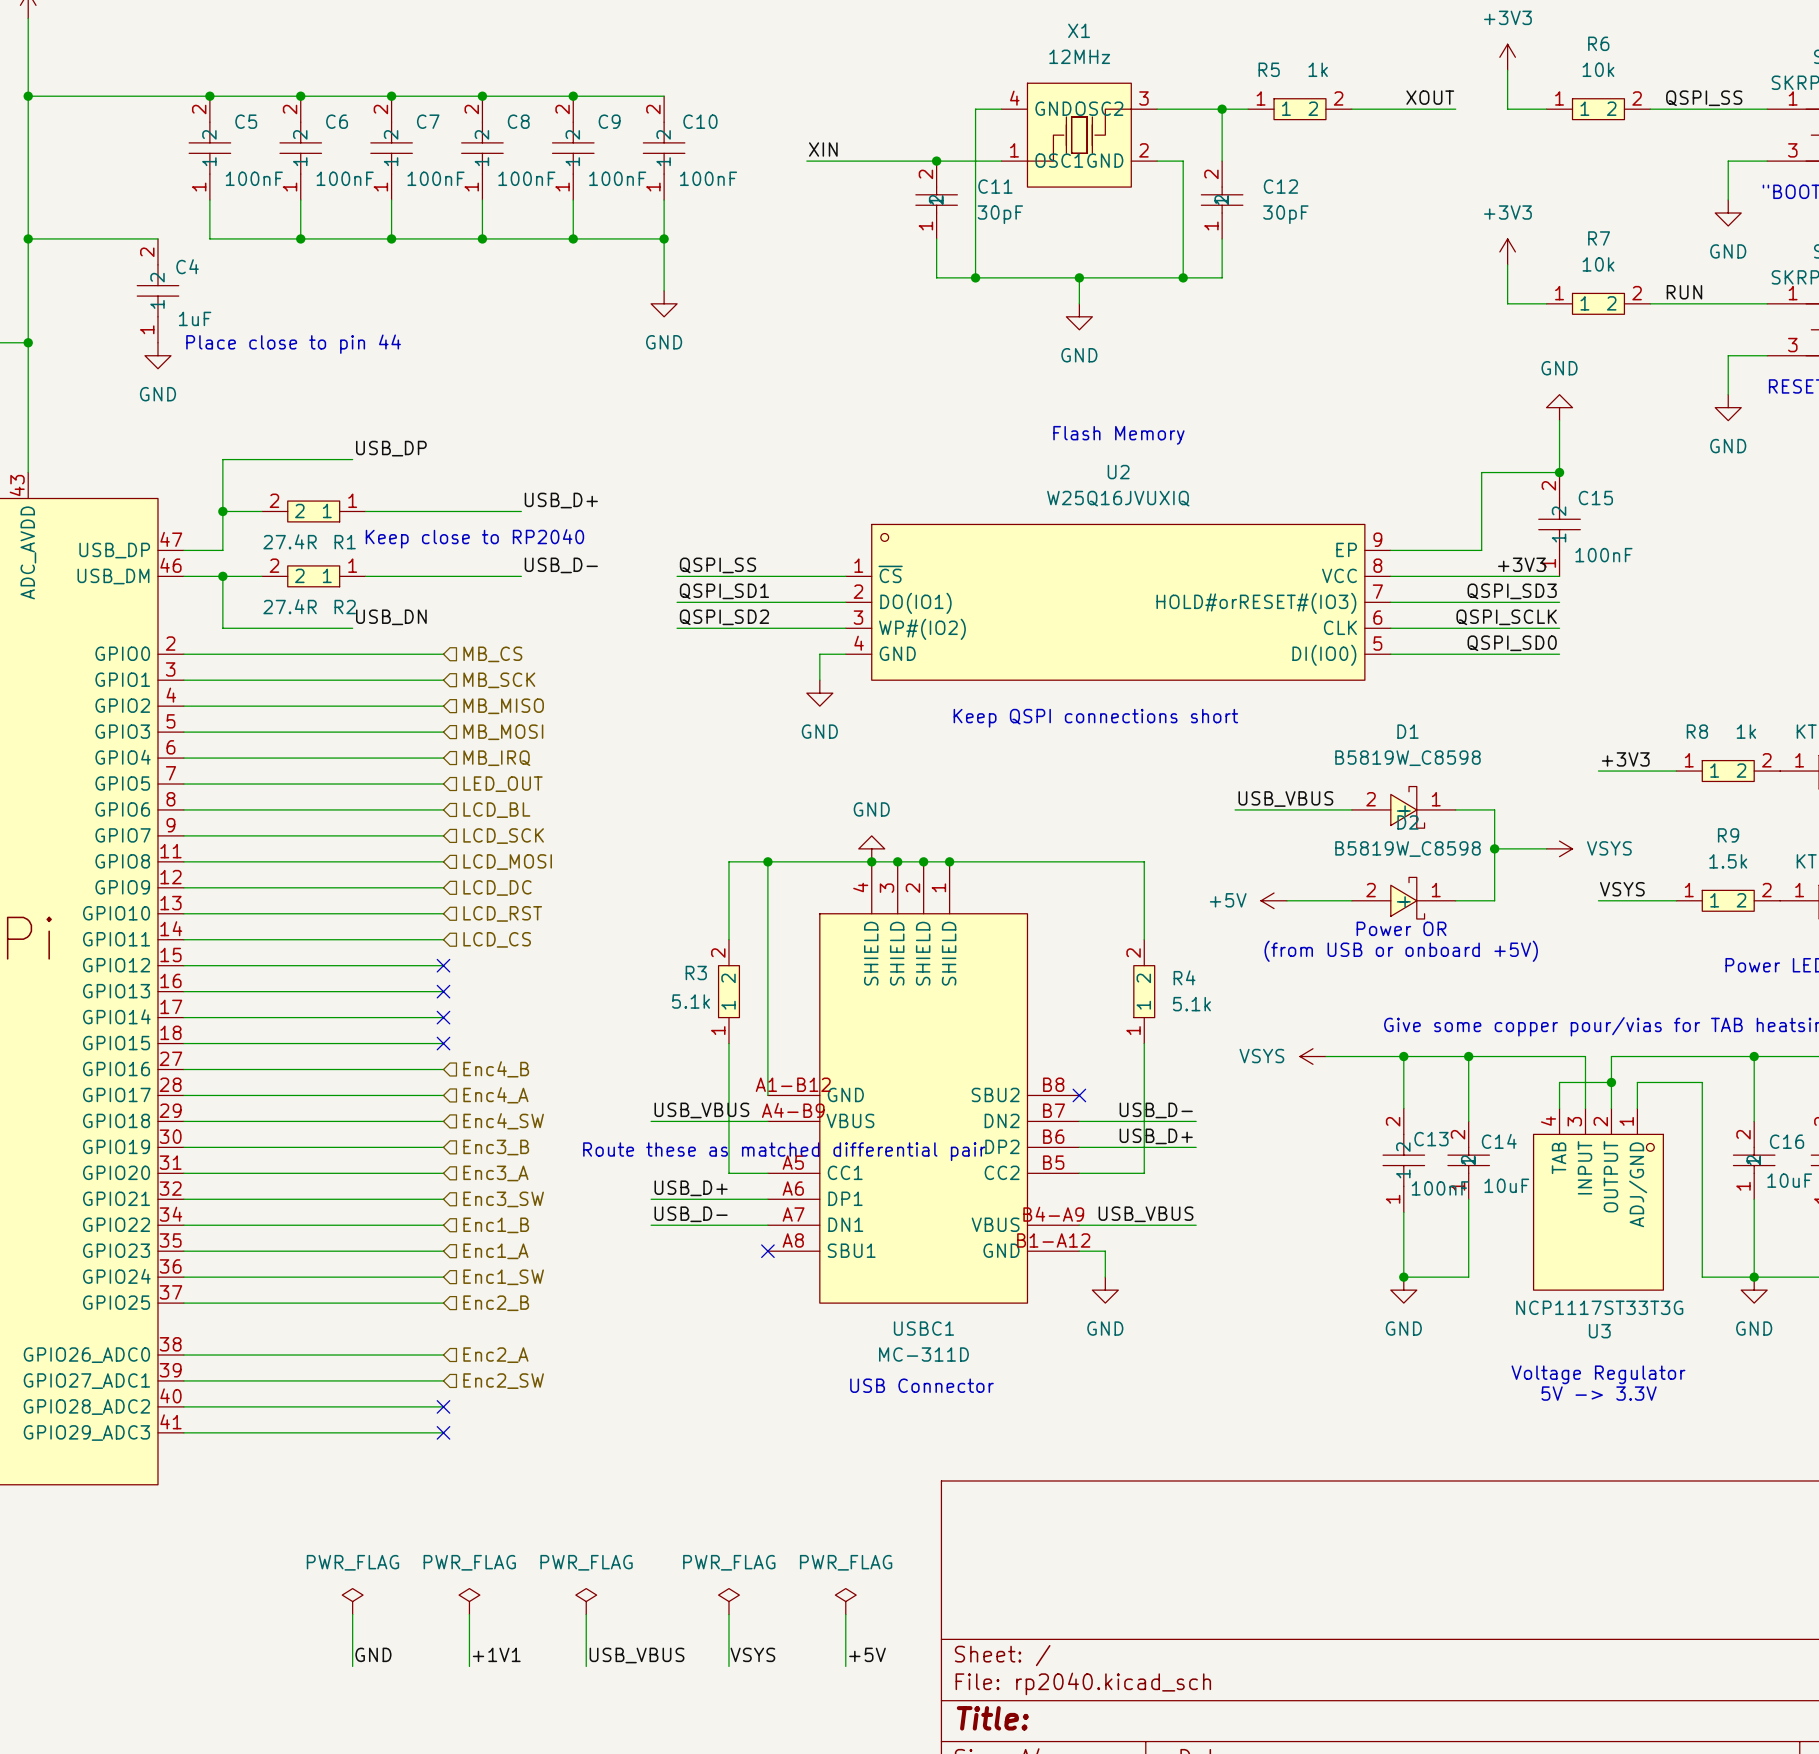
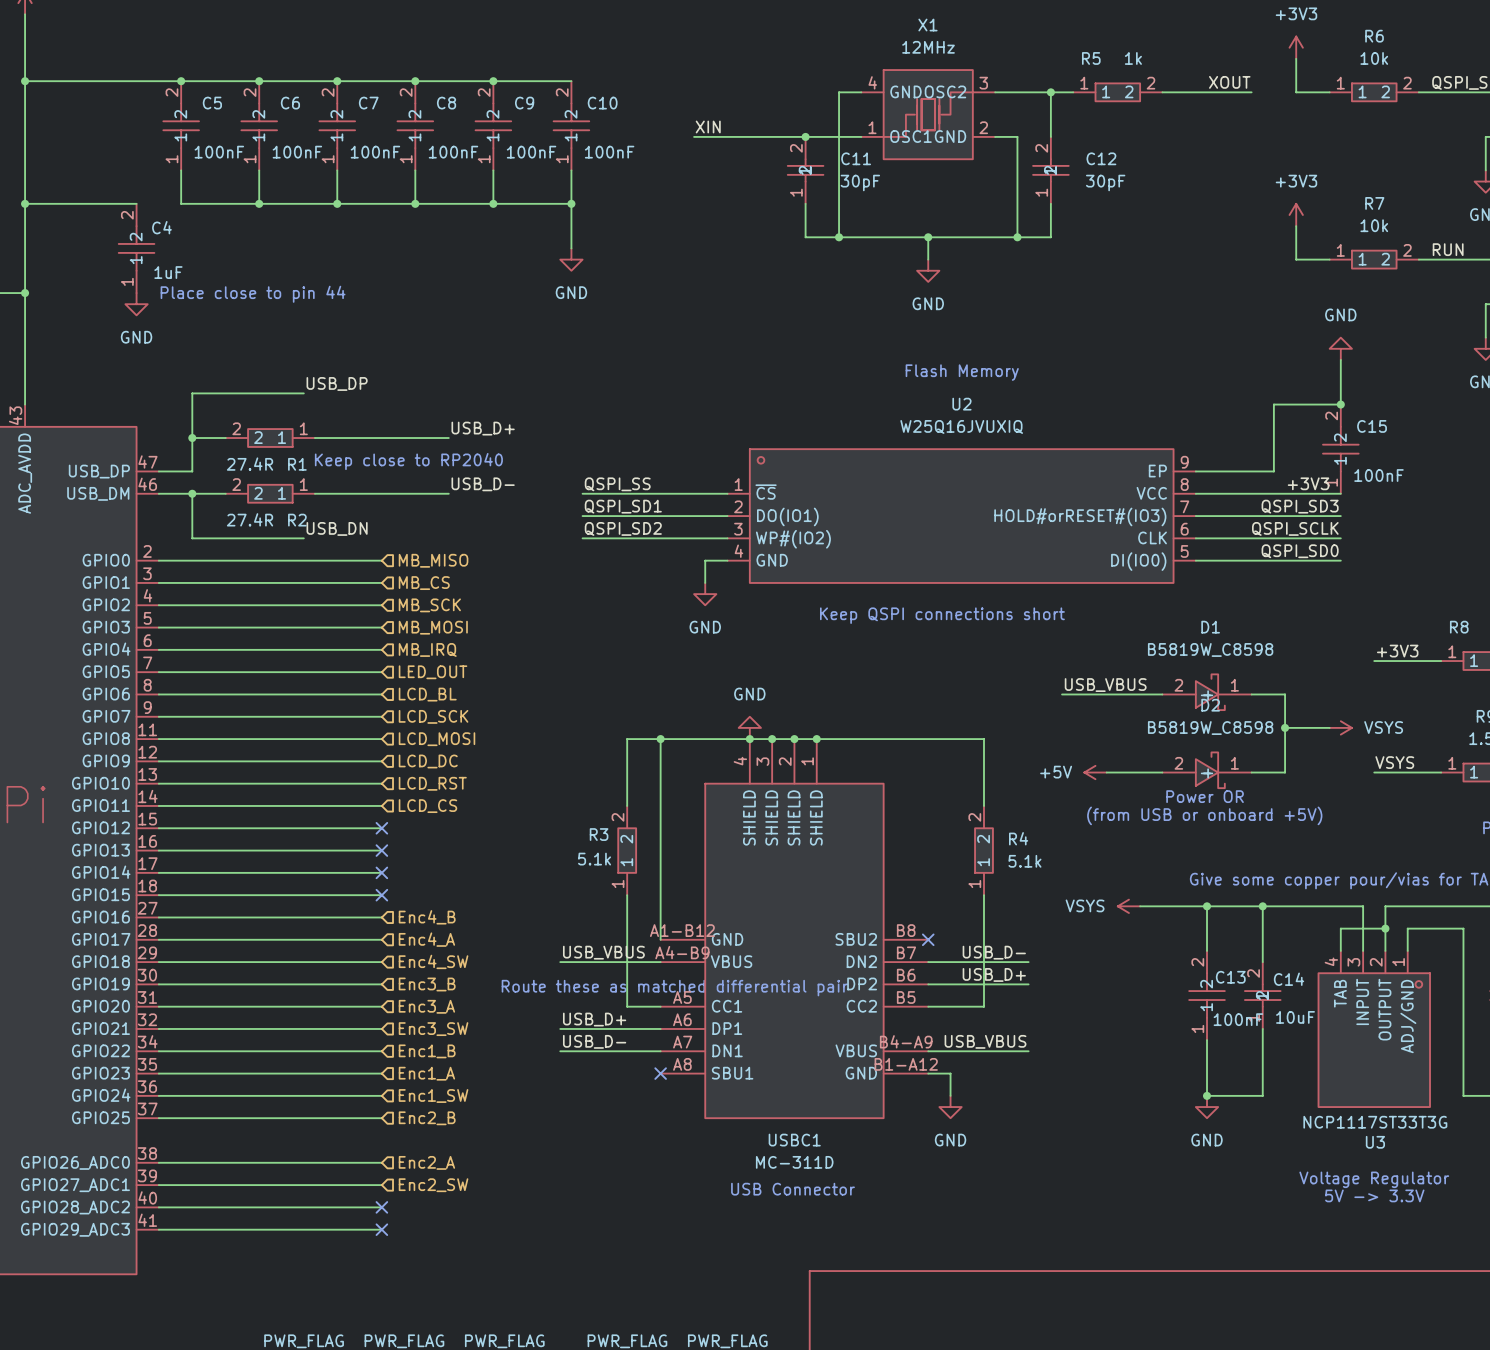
hierarchical label: MB_CS (492, 654) -> MB_MISO (433, 560)
hierarchical label: MB_SCK (499, 680) -> MB_CS (424, 583)
hierarchical label: MB_MISO (503, 706) -> MB_SCK (429, 605)

